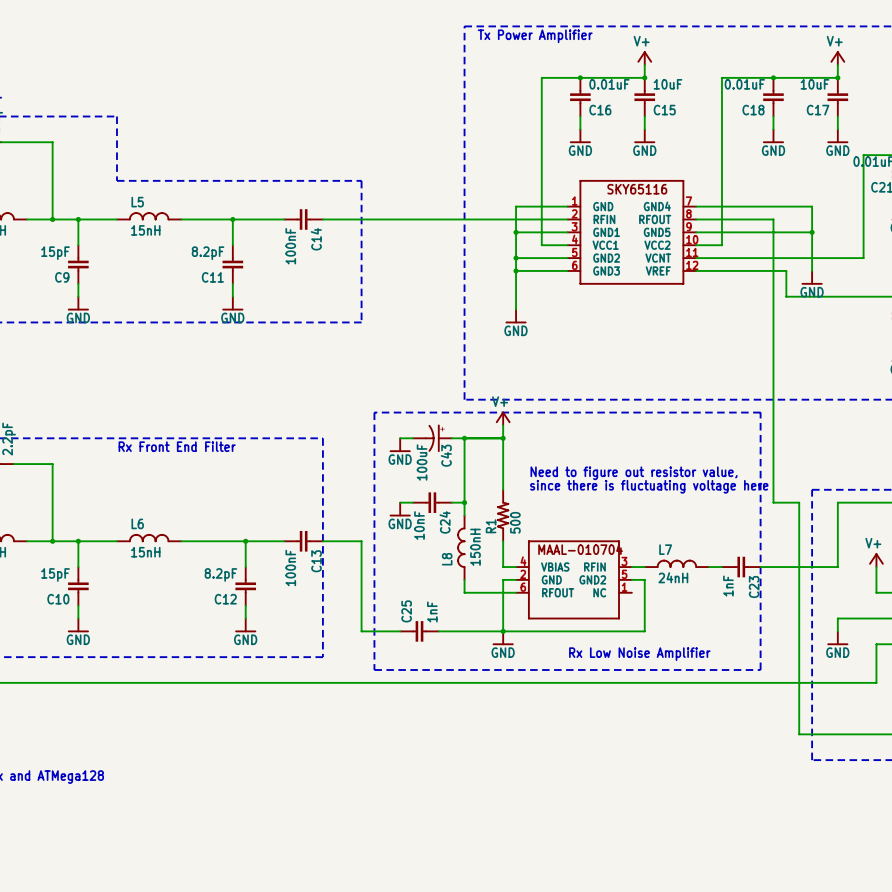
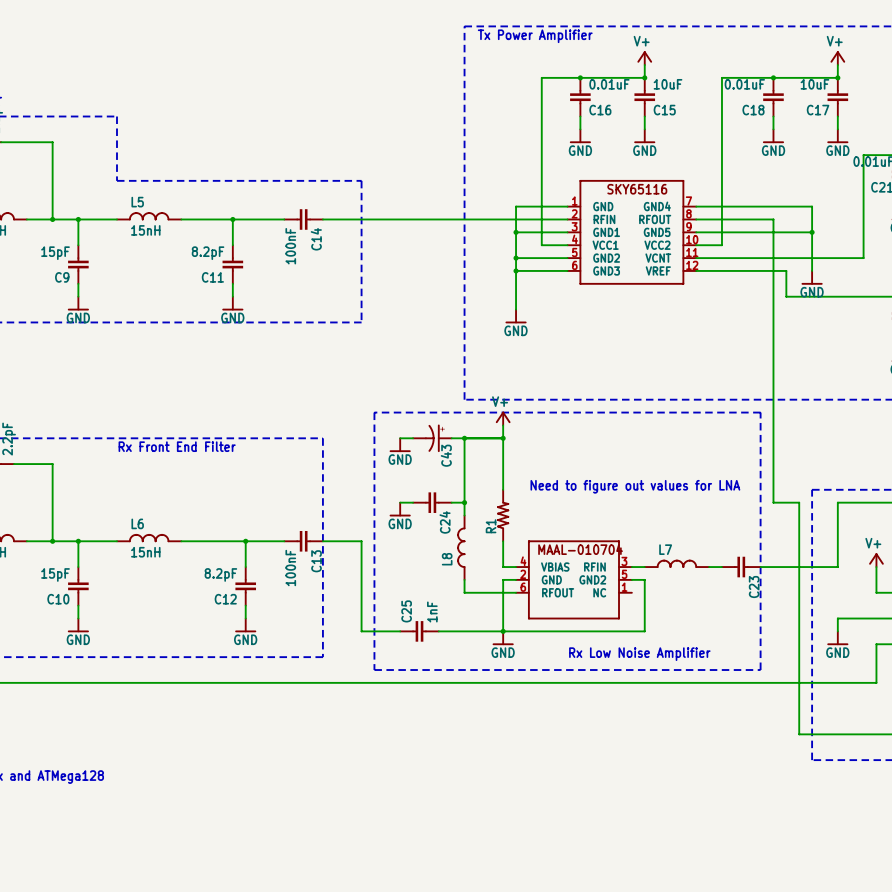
C43 value: 100uF (422, 462) -> none
text: Need to figure out resistor value, (634, 473) -> none
text: since there is fluctuating voltage here (649, 486) -> Need to figure out values for LNA (635, 486)
R1 value: 500 (515, 522) -> none
C24 value: 10nF (419, 525) -> none
L8 value: 150nH (475, 547) -> none
L7 value: 24nH (673, 577) -> none
C23 value: 1nF (728, 586) -> none

